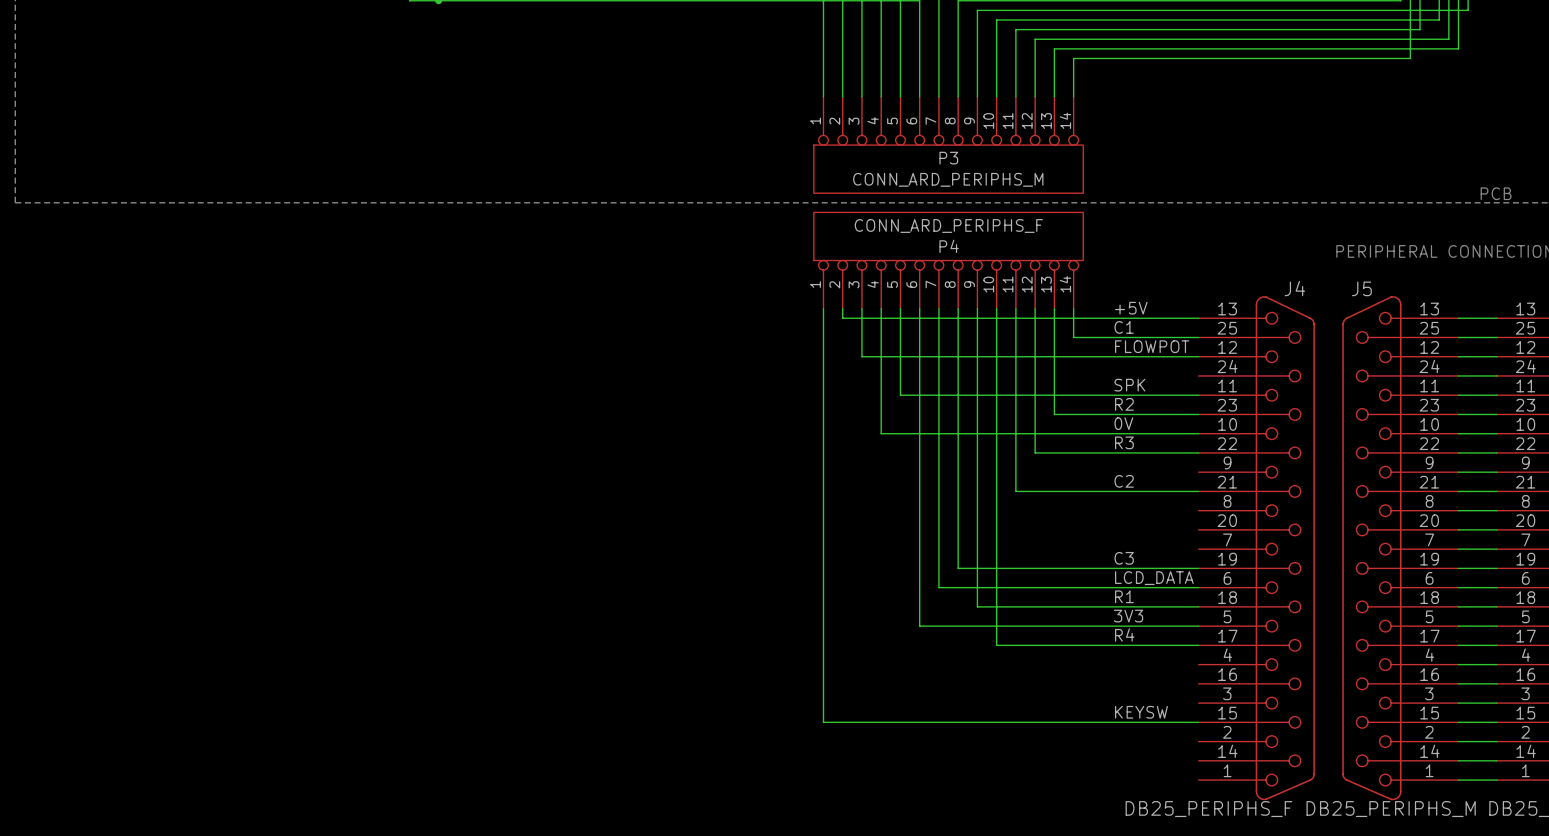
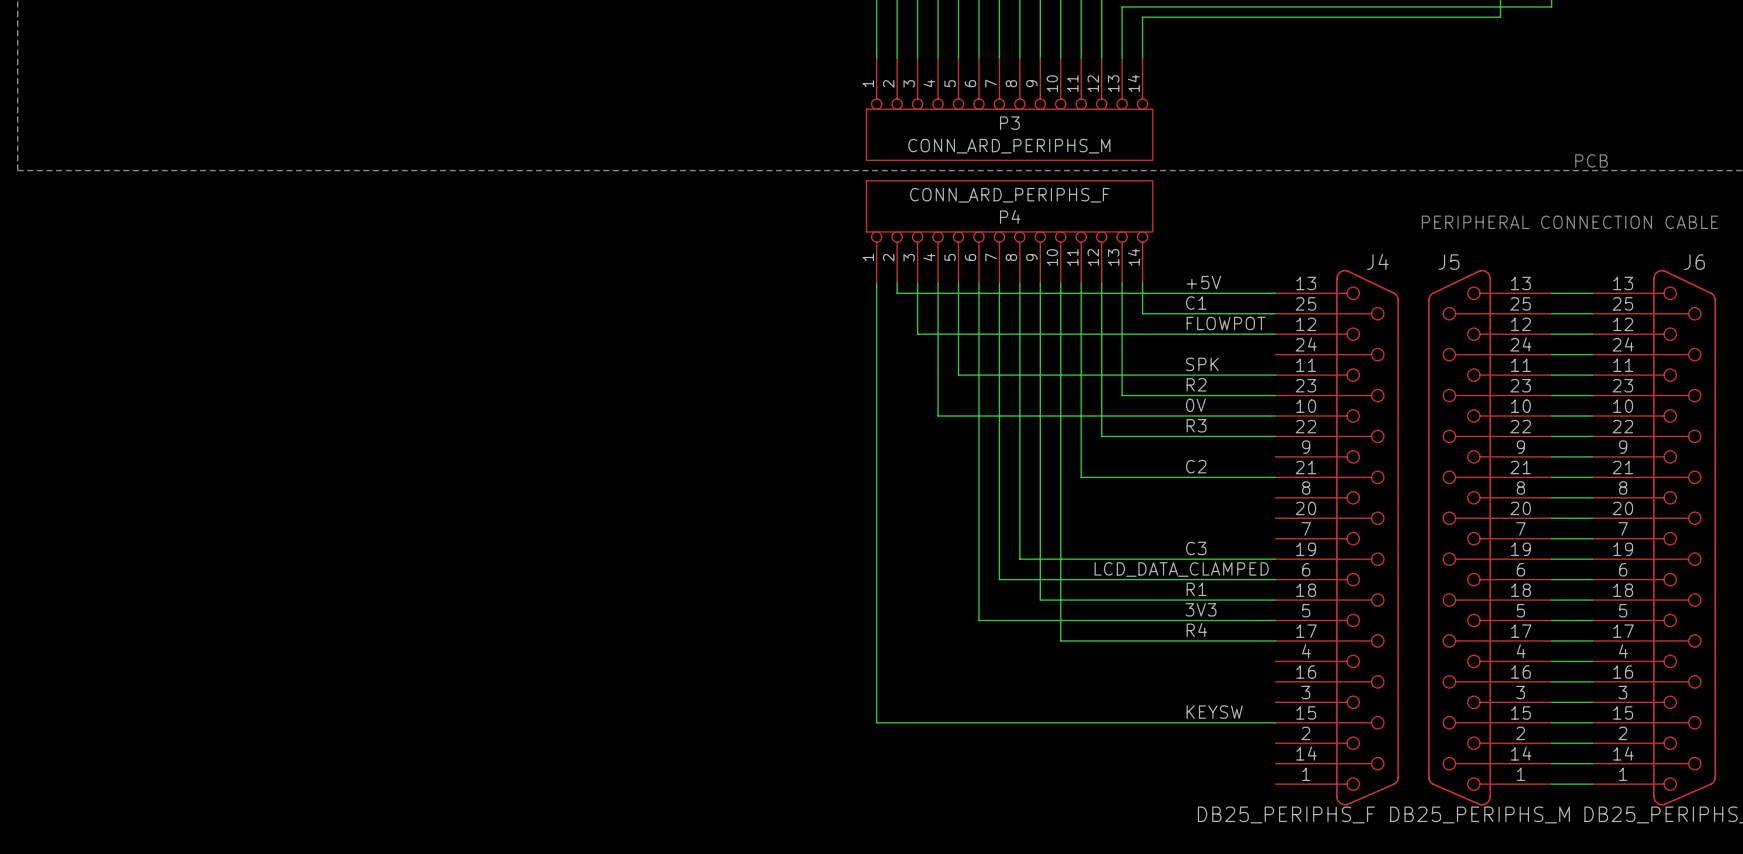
label: LCD_DATA (1154, 578) -> LCD_DATA_CLAMPED (1181, 569)

